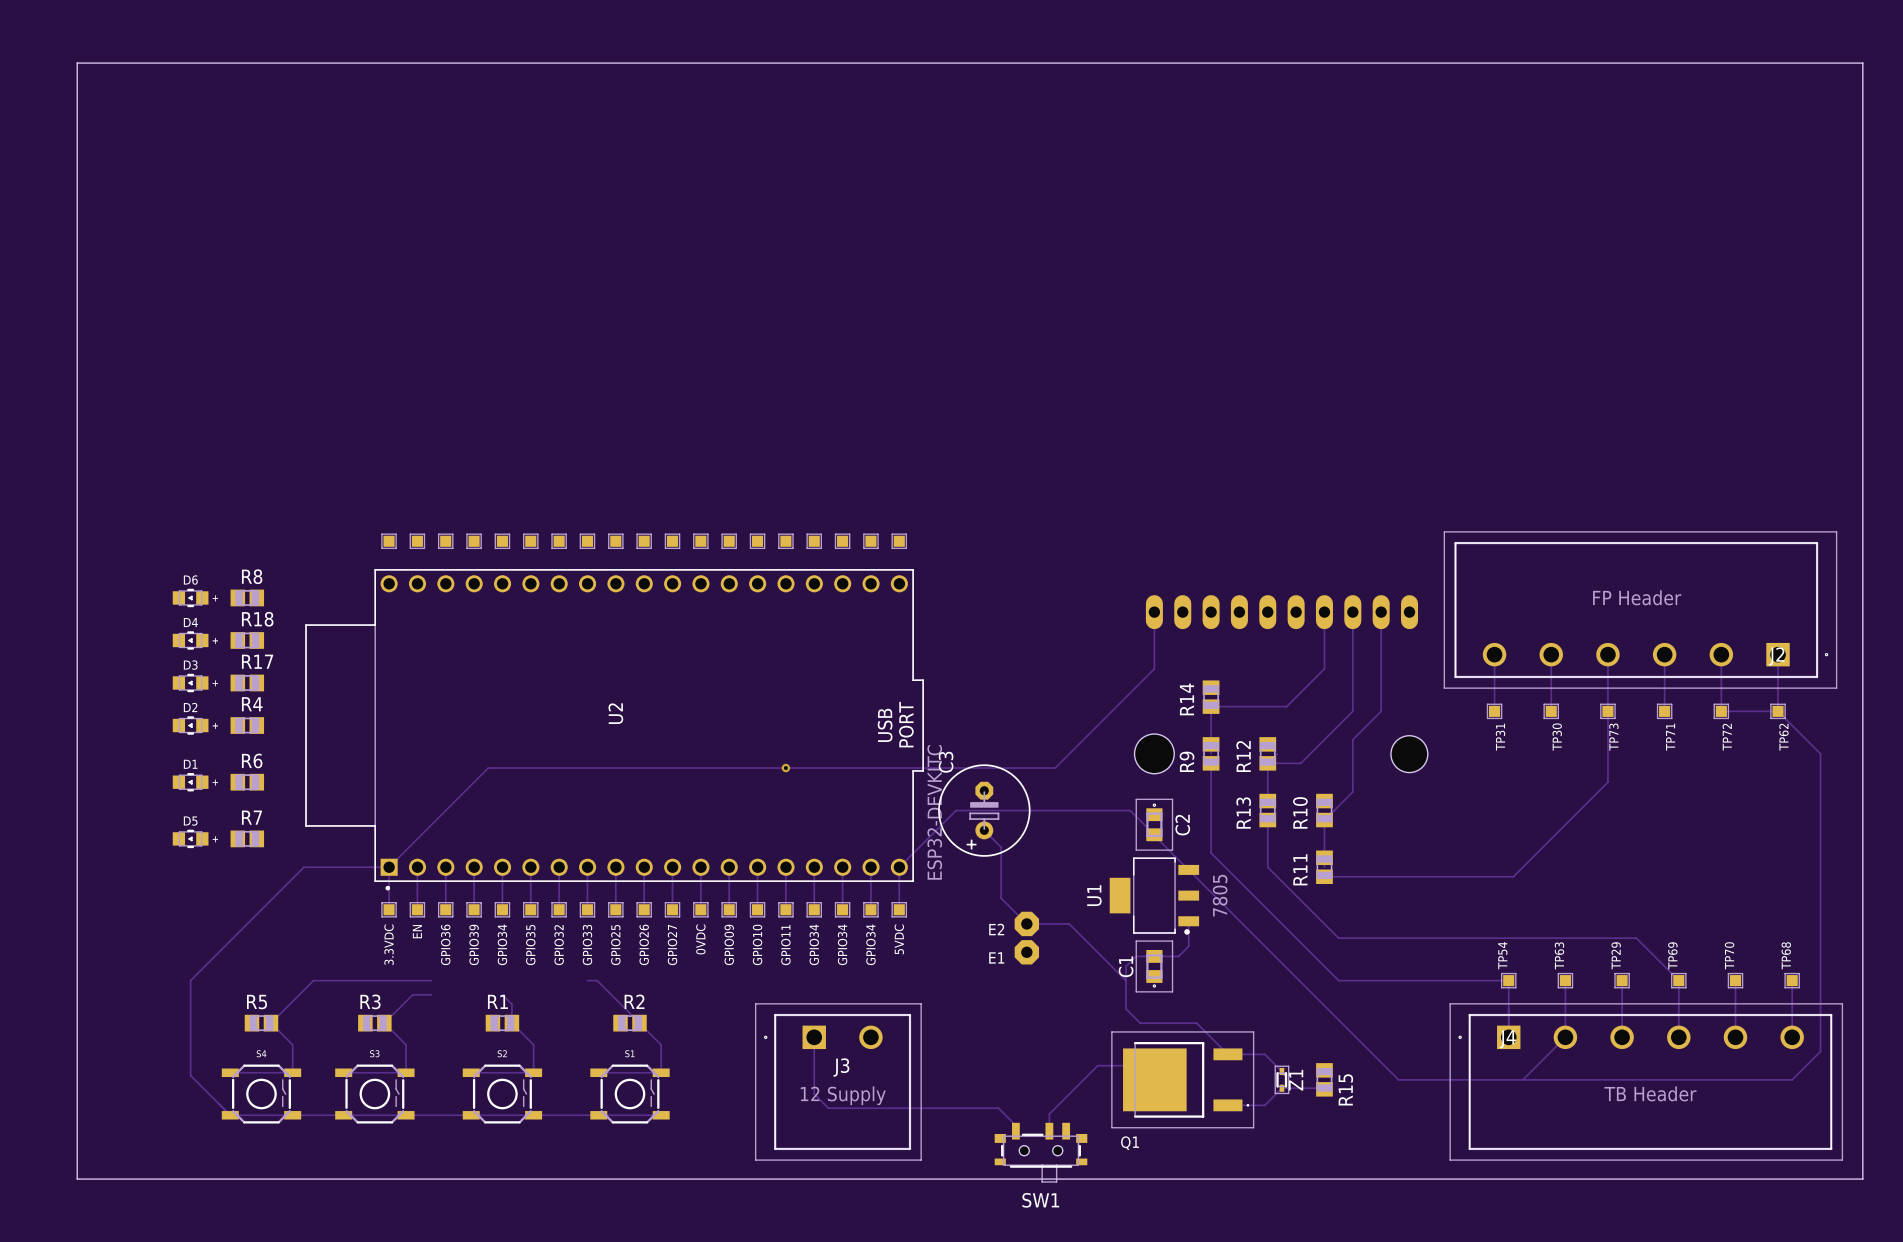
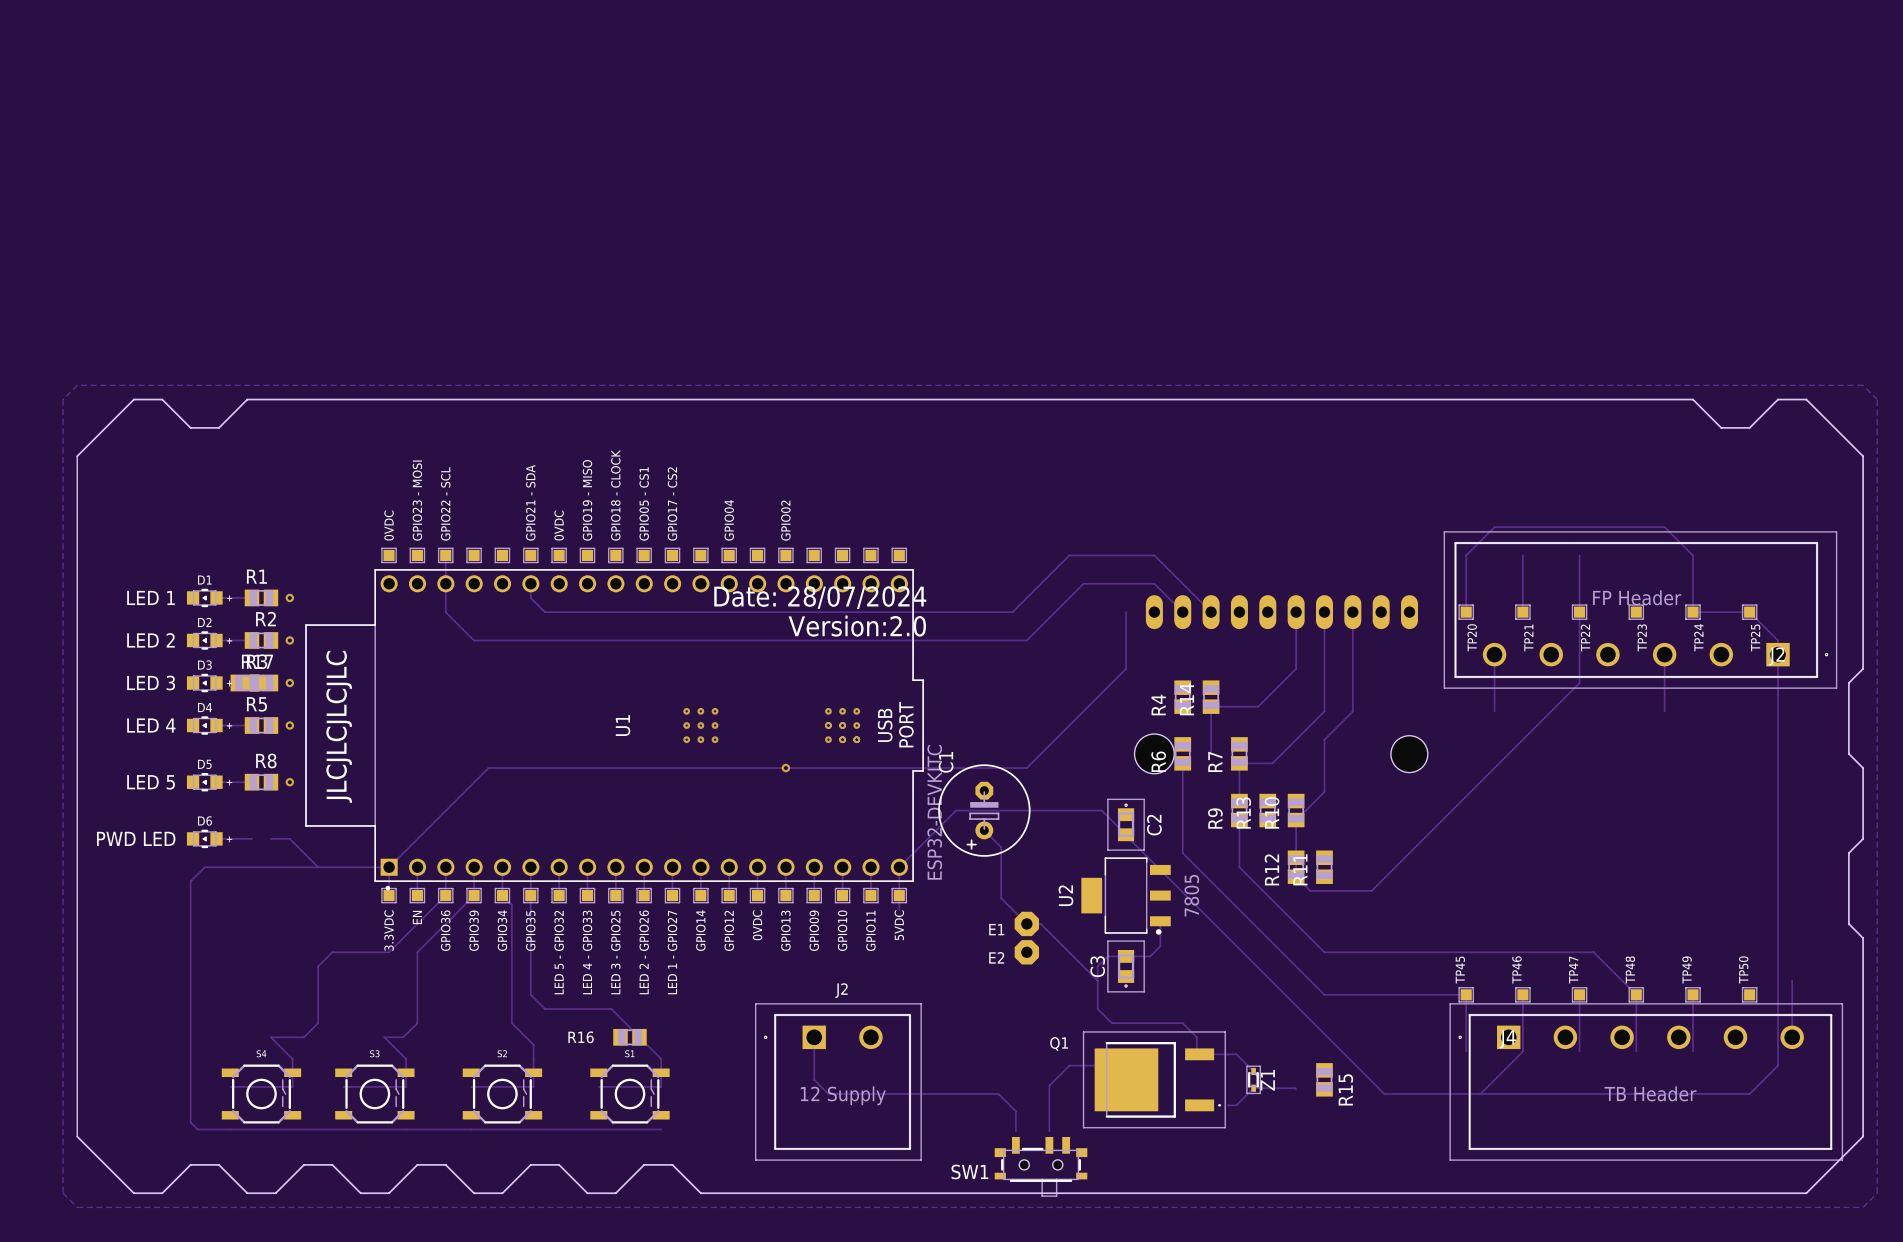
zone outline: none -> (77, 385) (1863, 385) (1877, 399) (1877, 1193) (1863, 1207) (77, 1207) (63, 1193) (63, 399) (77, 385)
board edge: (77, 456) (77, 63) (1862, 63) (1862, 1179) (77, 1179) (77, 1136) -> (77, 456) (133, 399) (162, 399) (190, 427) (218, 427) (247, 399) (1692, 399) (1721, 427) (1749, 427) (1778, 399) (1806, 399) (1863, 456) (1863, 668) (1848, 683) (1848, 753) (1863, 768) (1863, 838) (1848, 853) (1848, 923) (1863, 938) (1863, 1136) (1806, 1193) (700, 1193) (672, 1164) (644, 1164) (615, 1193) (587, 1193) (559, 1164) (530, 1164) (502, 1193) (474, 1193) (445, 1164) (417, 1164) (389, 1193) (360, 1193) (332, 1164) (304, 1164) (275, 1193) (247, 1193) (218, 1164) (190, 1164) (162, 1193) (133, 1193) (77, 1136)
text: none -> GPIO18 - CLOCK (615, 495)
text: none -> GPIO23 - MOSI (417, 500)
text: none -> GPIO19 - MISO (587, 500)
text: none -> GPIO21 - SDA (530, 502)
text: none -> GPIO22 - SCL (445, 503)
text: none -> GPIO05 - CS1 (644, 503)
text: none -> GPIO17 - CS2 (672, 504)
text: none -> GPIO04 (729, 520)
text: none -> GPIO02 (785, 520)
text: none -> 0VDC (389, 525)
text: none -> 0VDC (559, 525)
part position: (389, 541) -> (389, 555)
part position: (417, 541) -> (417, 555)
part position: (445, 541) -> (445, 555)
part position: (474, 541) -> (474, 555)
part position: (502, 541) -> (502, 555)
part position: (530, 541) -> (530, 555)
part position: (559, 541) -> (559, 555)
part position: (587, 541) -> (587, 555)
part position: (615, 541) -> (615, 555)
part position: (644, 541) -> (644, 555)
part position: (672, 541) -> (672, 555)
part position: (700, 541) -> (700, 555)
part position: (729, 541) -> (729, 555)
part position: (757, 541) -> (757, 555)
part position: (785, 541) -> (785, 555)
part position: (814, 541) -> (814, 555)
part position: (842, 541) -> (842, 555)
part position: (870, 541) -> (870, 555)
part position: (899, 541) -> (899, 555)
track: none -> (445, 555) (445, 612) (474, 640) (1026, 640) (1083, 583) (1154, 583) (1182, 612)
track: none -> (1579, 555) (1579, 683) (1371, 890) (1310, 890) (1296, 876)
track: none -> (530, 583) (530, 597) (544, 612) (1012, 612) (1069, 555) (1154, 555) (1211, 612)
text: none -> LED 1 (151, 597)
D6 position: (190, 597) -> (204, 838)
track: none -> (216, 597) (252, 597)
R8 position: (247, 597) -> (261, 782)
via: none -> (289, 597)
text: none -> Date: 28/07/2024 (820, 597)
track: (1154, 612) (1154, 668) (1055, 768) (1026, 768) -> (1126, 612) (1126, 668) (1026, 768)
track: none -> (1296, 612) (1296, 668) (1258, 706)
track: (1381, 612) (1381, 711) (1352, 739) (1352, 791) (1324, 820) (1324, 867) -> none
track: none -> (1466, 612) (1466, 555) (1494, 527) (1664, 527) (1692, 555) (1692, 612) (1749, 612) (1778, 640) (1778, 654)
TP20: none -> (1466, 612)
TP21: none -> (1522, 612)
TP22: none -> (1579, 612)
TP23: none -> (1636, 612)
TP24: none -> (1692, 612)
TP25: none -> (1749, 612)
text: none -> Version:2.0 (857, 626)
text: none -> LED 2 (150, 640)
D4 position: (190, 640) -> (204, 725)
track: none -> (216, 640) (252, 640)
R18: (247, 640) -> none
via: none -> (289, 640)
track: (1551, 654) (1551, 711) -> (1522, 555) (1522, 612)
track: (1607, 654) (1607, 782) (1513, 876) (1324, 876) -> none
track: (1721, 654) (1721, 711) (1778, 711) (1820, 753) (1820, 1051) (1792, 1079) (1398, 1079) (1130, 810) (1101, 810) -> (1778, 711) (1778, 1065) (1749, 1094) (1384, 1094) (1101, 810)
track: (1324, 668) (1286, 706) (1258, 706) -> (1324, 668) (1324, 711) (1272, 763)
text: none -> LED 3 (151, 683)
D3 position: (190, 683) -> (204, 683)
via: none -> (289, 683)
R4 name position: R4 (252, 704) -> R4 (1158, 705)
via: none -> (686, 711)
via: none -> (700, 711)
via: none -> (715, 711)
via: none -> (828, 711)
via: none -> (842, 711)
via: none -> (856, 711)
TP31: (1494, 711) -> none
TP30: (1551, 711) -> none
TP73: (1607, 711) -> none
TP71: (1664, 711) -> none
TP72: (1721, 711) -> none
TP62: (1778, 711) -> none
U2 name: U2 (615, 713) -> U1 (623, 725)
text: none -> LED 4 (151, 725)
D2 position: (190, 725) -> (204, 640)
track: none -> (216, 725) (252, 725)
R4 rotation: 0° (247, 725) -> 90° clockwise (1182, 697)
R4 position: (247, 725) -> (1182, 697)
via: none -> (289, 725)
via: none -> (686, 725)
via: none -> (700, 725)
via: none -> (715, 725)
via: none -> (828, 725)
via: none -> (842, 725)
via: none -> (856, 725)
text: none -> JLCJLCJLCJLC (339, 726)
via: none -> (686, 739)
via: none -> (700, 739)
via: none -> (715, 739)
via: none -> (828, 739)
via: none -> (842, 739)
via: none -> (856, 739)
track: (1324, 739) (1300, 763) (1272, 763) -> (1324, 739) (1324, 791) (1296, 820) (1296, 867)
R9 position: (1211, 753) -> (1239, 810)
R12 position: (1267, 753) -> (1296, 867)
track: (1277, 754) (1267, 763) (1267, 801) -> none
R6 name position: R6 (252, 760) -> R6 (1158, 761)
C3 name: C3 (946, 762) -> C1 (946, 762)
track: none -> (1182, 763) (1182, 853) (1324, 994) (1466, 994) (1466, 1051)
track: (1211, 763) (1211, 853) (1338, 980) (1508, 980) (1508, 1037) -> none
track: none -> (1267, 763) (1239, 763) (1239, 801)
text: none -> LED 5 (151, 782)
D1 position: (190, 782) -> (204, 597)
track: none -> (216, 782) (252, 782)
R6 rotation: 0° (247, 782) -> 90° clockwise (1182, 753)
R6 position: (247, 782) -> (1182, 753)
via: none -> (289, 782)
R10 position: (1324, 810) -> (1296, 810)
R7 name position: R7 (251, 817) -> R7 (1215, 761)
track: none -> (1239, 820) (1239, 867) (1324, 952) (1593, 952) (1636, 994) (1636, 1051)
track: (1267, 820) (1267, 867) (1338, 938) (1636, 938) (1678, 980) (1678, 1037) -> none
C2 position: (1154, 824) -> (1126, 824)
text: none -> PWD LED (136, 838)
D5 position: (190, 838) -> (204, 782)
track: none -> (216, 838) (252, 838)
R7 rotation: 0° (247, 838) -> 90° clockwise (1239, 753)
R7 position: (247, 838) -> (1239, 753)
track: none -> (270, 838) (289, 838) (318, 867)
track: (304, 867) (190, 980) -> (304, 867) (204, 867) (190, 881) (190, 980)
track: (389, 895) (389, 909) -> none
track: (417, 895) (417, 909) -> none
track: (445, 895) (445, 909) -> none
track: (474, 895) (474, 909) -> none
track: (502, 895) (502, 909) -> (502, 895) (511, 905) (511, 1004)
track: (559, 895) (559, 909) -> none
track: (587, 895) (587, 909) -> none
track: (615, 895) (615, 909) -> none
track: (644, 895) (644, 909) -> none
track: (672, 895) (672, 909) -> none
track: (700, 895) (700, 909) -> none
track: (729, 895) (729, 909) -> none
track: (757, 895) (757, 909) -> none
track: (785, 895) (785, 909) -> none
track: (814, 895) (814, 909) -> none
track: (842, 895) (842, 909) -> none
track: (870, 895) (870, 909) -> none
U2: none -> 7805 (1126, 896)
U1: 7805 (1154, 896) -> none
part position: (389, 909) -> (389, 895)
part position: (417, 909) -> (417, 895)
part position: (445, 909) -> (445, 895)
part position: (474, 909) -> (474, 895)
part position: (502, 909) -> (502, 895)
part position: (530, 909) -> (530, 895)
part position: (559, 909) -> (559, 895)
part position: (587, 909) -> (587, 895)
part position: (615, 909) -> (615, 895)
part position: (644, 909) -> (644, 895)
part position: (672, 909) -> (672, 895)
part position: (700, 909) -> (700, 895)
part position: (729, 909) -> (729, 895)
part position: (757, 909) -> (757, 895)
part position: (785, 909) -> (785, 895)
part position: (814, 909) -> (814, 895)
part position: (842, 909) -> (842, 895)
part position: (870, 909) -> (870, 895)
part position: (899, 909) -> (899, 895)
track: (1188, 921) (1188, 946) (1178, 956) (1150, 956) -> (1160, 921) (1160, 946) (1150, 956)
track: (1040, 923) (1069, 923) (1125, 980) -> (1040, 923) (1097, 980)
E2 name: E2 (996, 929) -> E1 (996, 929)
text: none -> GPIO14 (700, 930)
text: none -> GPIO12 (729, 930)
text: none -> GPIO13 (785, 930)
text position: EN (417, 931) -> EN (417, 917)
text position: 0VDC (700, 939) -> 0VDC (757, 925)
text position: 5VDC (899, 939) -> 5VDC (899, 925)
text position: 3.3VDC (389, 944) -> 3.3VDC (389, 930)
text position: GPIO36 (445, 944) -> GPIO36 (445, 930)
text position: GPIO39 (474, 944) -> GPIO39 (474, 930)
text position: GPIO34 (502, 944) -> GPIO34 (502, 930)
text: GPIO33 (587, 944) -> none
text: GPIO26 (644, 944) -> none
text position: GPIO09 (729, 944) -> GPIO09 (814, 930)
text position: GPIO10 (757, 944) -> GPIO10 (842, 930)
text: GPIO34 (814, 944) -> none
text: GPIO34 (842, 944) -> none
text: GPIO34 (870, 944) -> none
text position: GPIO35 (530, 945) -> GPIO35 (530, 930)
text: GPIO32 (559, 945) -> none
text: GPIO25 (615, 945) -> none
text: GPIO27 (672, 945) -> none
text position: GPIO11 (785, 945) -> GPIO11 (870, 930)
text: none -> LED 5 - GPIO32 (559, 952)
text: none -> LED 4 - GPIO33 (587, 952)
text: none -> LED 3 - GPIO25 (615, 952)
text: none -> LED 2 - GPIO26 (644, 952)
text: none -> LED 1 - GPIO27 (672, 952)
track: (1136, 956) (1126, 966) (1126, 1008) (1140, 1023) -> (1136, 956) (1107, 956) (1097, 966) (1097, 1008) (1111, 1023) (1140, 1023)
E1 name: E1 (996, 957) -> E2 (996, 957)
C3: none -> (1126, 966)
C1: (1154, 966) -> none
track: (431, 980) (313, 980) (270, 1023) (292, 1044) (292, 1059) -> (445, 895) (389, 952) (332, 952) (318, 966) (318, 1023) (304, 1037) (270, 1037) (292, 1059)
track: (587, 980) (597, 980) (661, 1044) (661, 1059) -> (530, 909) (530, 994) (544, 1008) (611, 1008) (661, 1059)
TP54: (1508, 980) -> none
track: (1565, 980) (1565, 1037) (1522, 1079) -> (1522, 994) (1522, 1051) (1480, 1094)
TP63: (1565, 980) -> none
track: (1622, 980) (1622, 1037) -> (1579, 994) (1579, 1051)
TP29: (1622, 980) -> none
TP69: (1678, 980) -> none
track: (1735, 980) (1735, 1037) -> (1692, 994) (1692, 1051)
TP70: (1735, 980) -> none
TP68: (1792, 980) -> none
track: (431, 994) (412, 994) (384, 1023) (406, 1044) (406, 1059) -> (474, 895) (417, 952) (417, 1023) (403, 1037) (384, 1037) (406, 1059)
track: (502, 994) (511, 1004) -> none
TP45: none -> (1466, 994)
TP46: none -> (1522, 994)
TP47: none -> (1579, 994)
TP48: none -> (1636, 994)
TP49: none -> (1692, 994)
TP50: none -> (1749, 994)
R5 position: (261, 1023) -> (261, 725)
R3 position: (374, 1023) -> (261, 683)
R1 position: (502, 1023) -> (261, 597)
R2 position: (629, 1023) -> (261, 640)
track: (1182, 1023) (1196, 1023) (1227, 1054) -> (1182, 1023) (1196, 1037) (1196, 1051) (1199, 1054) (1227, 1054)
R16: none -> (629, 1037)
track: (1236, 1054) (1264, 1054) (1281, 1071) -> (1236, 1054) (1253, 1071)
track: (1126, 1065) (1097, 1065) (1049, 1114) -> (1097, 1065) (1069, 1065) (1049, 1085) (1049, 1114)
J3 name: J3 (841, 1067) -> J2 (841, 990)
track: (230, 1072) (292, 1072) -> (230, 1086) (292, 1086) (292, 1072)
track: (343, 1072) (406, 1072) -> (343, 1086) (406, 1086) (406, 1072)
track: (471, 1072) (533, 1072) -> (471, 1086) (533, 1086) (533, 1072)
track: (598, 1072) (661, 1072) -> (598, 1086) (661, 1086) (661, 1072)
track: (190, 1075) (230, 1115) (661, 1115) -> (190, 1075) (190, 1122) (197, 1129) (661, 1129)
track: (814, 1079) (814, 1094) (828, 1108) (998, 1108) (1015, 1125) -> (814, 1079) (828, 1094) (998, 1094) (1015, 1111) (1015, 1125)
Q1 position: (1182, 1079) -> (1154, 1079)
Z1 position: (1281, 1079) -> (1253, 1079)
track: (1281, 1088) (1264, 1105) (1236, 1105) -> (1281, 1088) (1253, 1088) (1236, 1105)
track: (1295, 1088) (1324, 1089) -> (1295, 1088) (1296, 1089)
Q1 name position: Q1 (1130, 1143) -> Q1 (1059, 1043)
SW1 position: (1041, 1152) -> (1041, 1166)
SW1 name position: SW1 (1040, 1200) -> SW1 (969, 1171)

